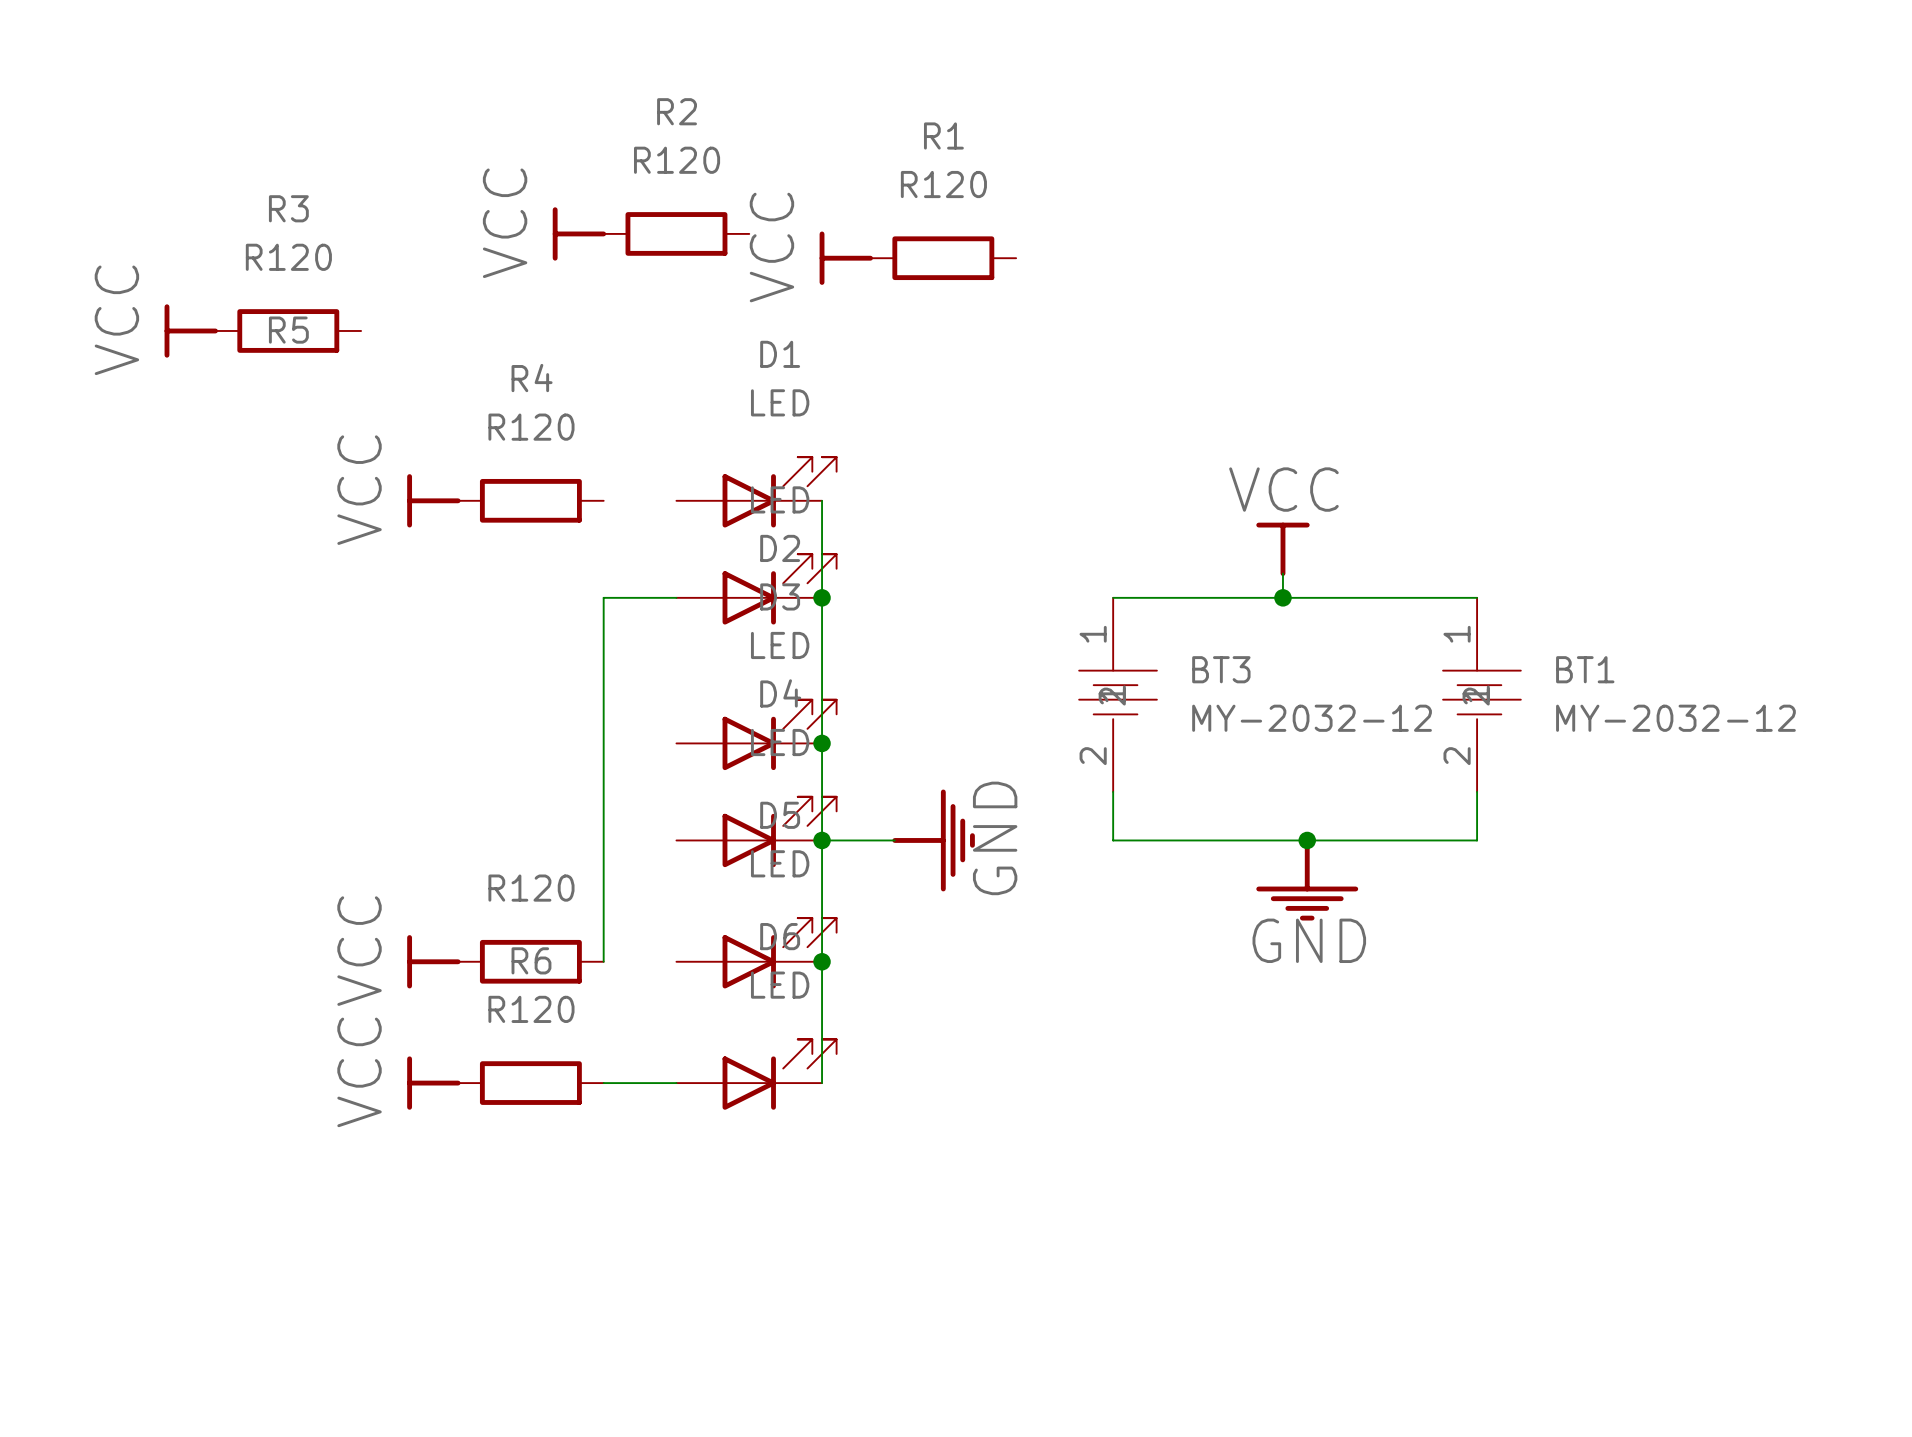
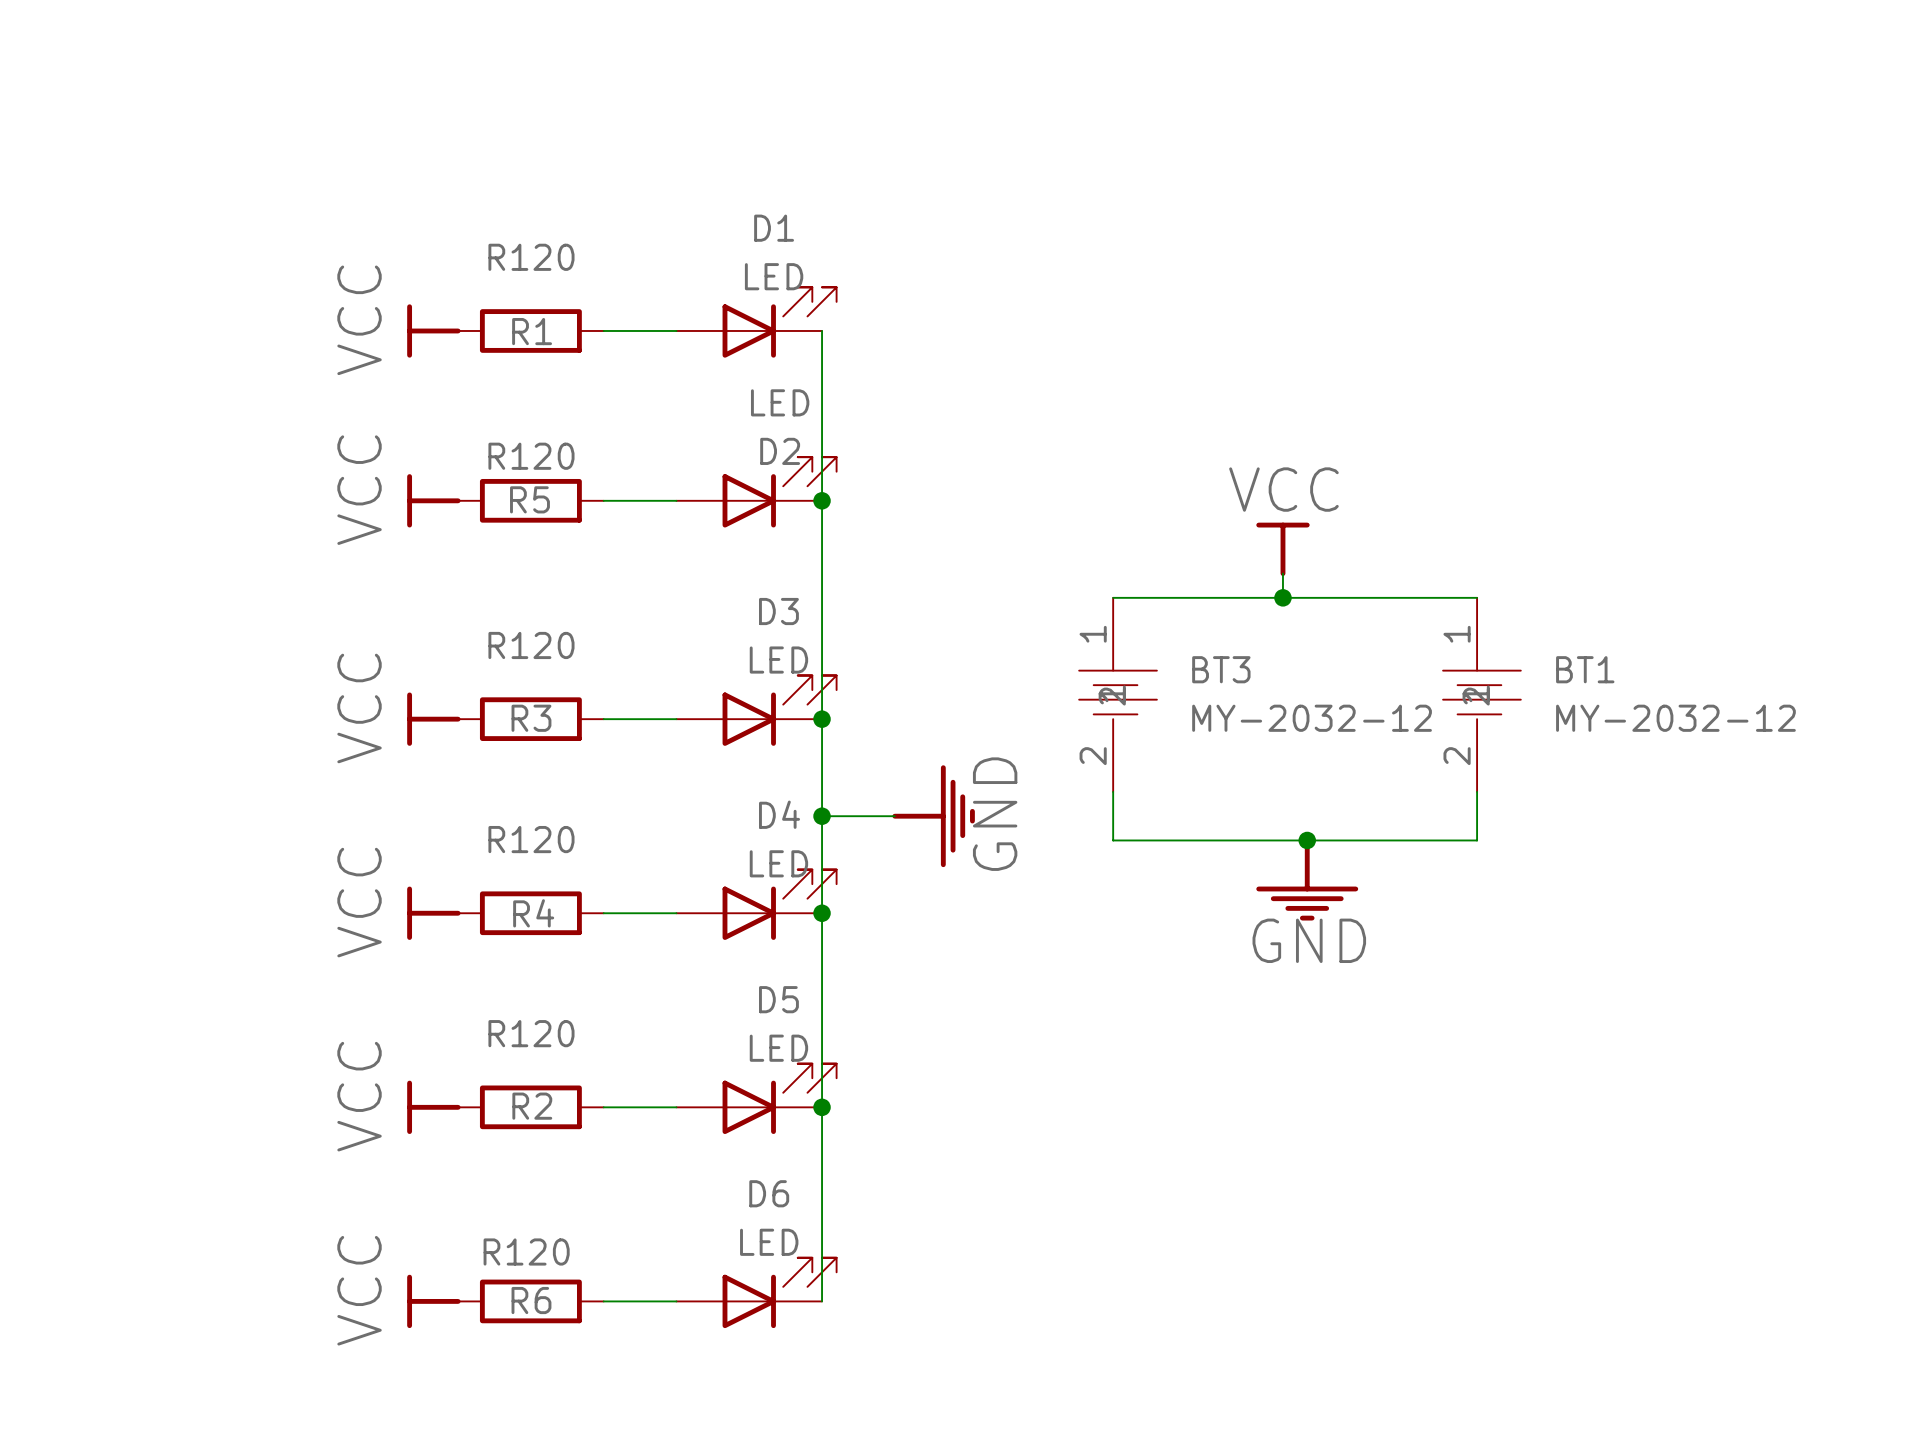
R2 name position: R2 (677, 111) -> R2 (532, 1106)
R1 name position: R1 (943, 135) -> R1 (532, 331)
R3 name position: R3 (288, 208) -> R3 (531, 718)
power symbol: VCC (579, 233) -> none
R2 position: (676, 233) -> (530, 1107)
power symbol: VCC (846, 258) -> none
R1 position: (943, 258) -> (530, 330)
D1: none -> LED (756, 322)
power symbol: VCC (191, 330) -> none
R3 position: (288, 330) -> (530, 719)
power symbol: none -> VCC (433, 330)
wire: none -> (603, 330) (676, 330)
wire: none -> (822, 330) (822, 500)
D1 name: D1 (780, 354) -> D2 (780, 451)
R4 name: R4 (532, 378) -> R5 (529, 499)
R4 value position: R120 (531, 427) -> R120 (531, 456)
wire: none -> (603, 500) (676, 500)
junction: none -> (822, 500)
D2: LED (756, 589) -> none
D3 name position: D3 (780, 596) -> D3 (778, 611)
wire: (676, 597) (603, 597) (603, 961) -> none
junction: (822, 597) -> none
D3 value position: LED (780, 645) -> LED (778, 660)
D4 name position: D4 (780, 693) -> D4 (779, 814)
power symbol: none -> VCC (433, 719)
wire: none -> (603, 719) (676, 719)
D3 position: (756, 734) -> (756, 710)
D4 value position: LED (780, 742) -> LED (778, 863)
junction position: (822, 743) -> (822, 719)
D5 name position: D5 (780, 815) -> D5 (778, 999)
D4 position: (756, 831) -> (756, 904)
wire: (822, 840) (894, 840) -> (822, 816) (894, 816)
junction position: (822, 840) -> (822, 816)
power symbol position: GND (933, 840) -> GND (933, 816)
D5 value position: LED (780, 863) -> LED (778, 1048)
R4: none -> R120 (530, 913)
wire: none -> (603, 913) (676, 913)
junction: none -> (822, 913)
D6 name position: D6 (780, 936) -> D6 (769, 1193)
D5 position: (756, 953) -> (756, 1098)
R6 name position: R6 (531, 960) -> R6 (531, 1300)
power symbol position: VCC (433, 961) -> VCC (433, 913)
R5: R120 (530, 961) -> none
junction: (822, 961) -> none
D6 value position: LED (780, 985) -> LED (769, 1242)
R6 value position: R120 (531, 1009) -> R120 (526, 1251)
D6 position: (756, 1074) -> (756, 1292)
power symbol position: VCC (433, 1083) -> VCC (433, 1107)
R6 position: (530, 1083) -> (530, 1301)
wire: (603, 1083) (676, 1083) -> (603, 1107) (676, 1107)
wire: none -> (822, 1083) (822, 1301)
junction: none -> (822, 1107)
power symbol: none -> VCC (433, 1301)
wire: none -> (603, 1301) (676, 1301)

